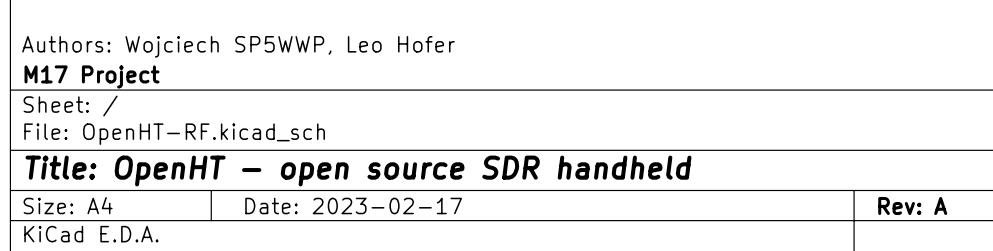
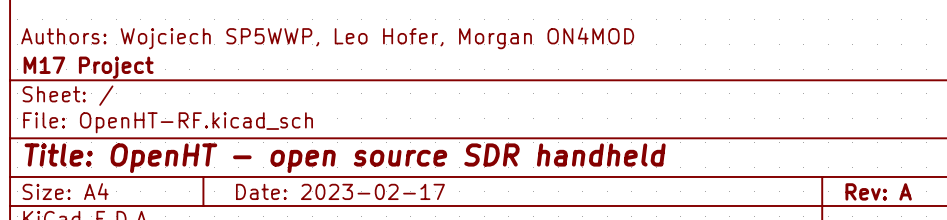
title block: Authors: Wojciech SP5WWP, Leo Hofer (238, 46) -> Authors: Wojciech SP5WWP, Leo Hofer, Morgan ON4MOD (327, 38)

